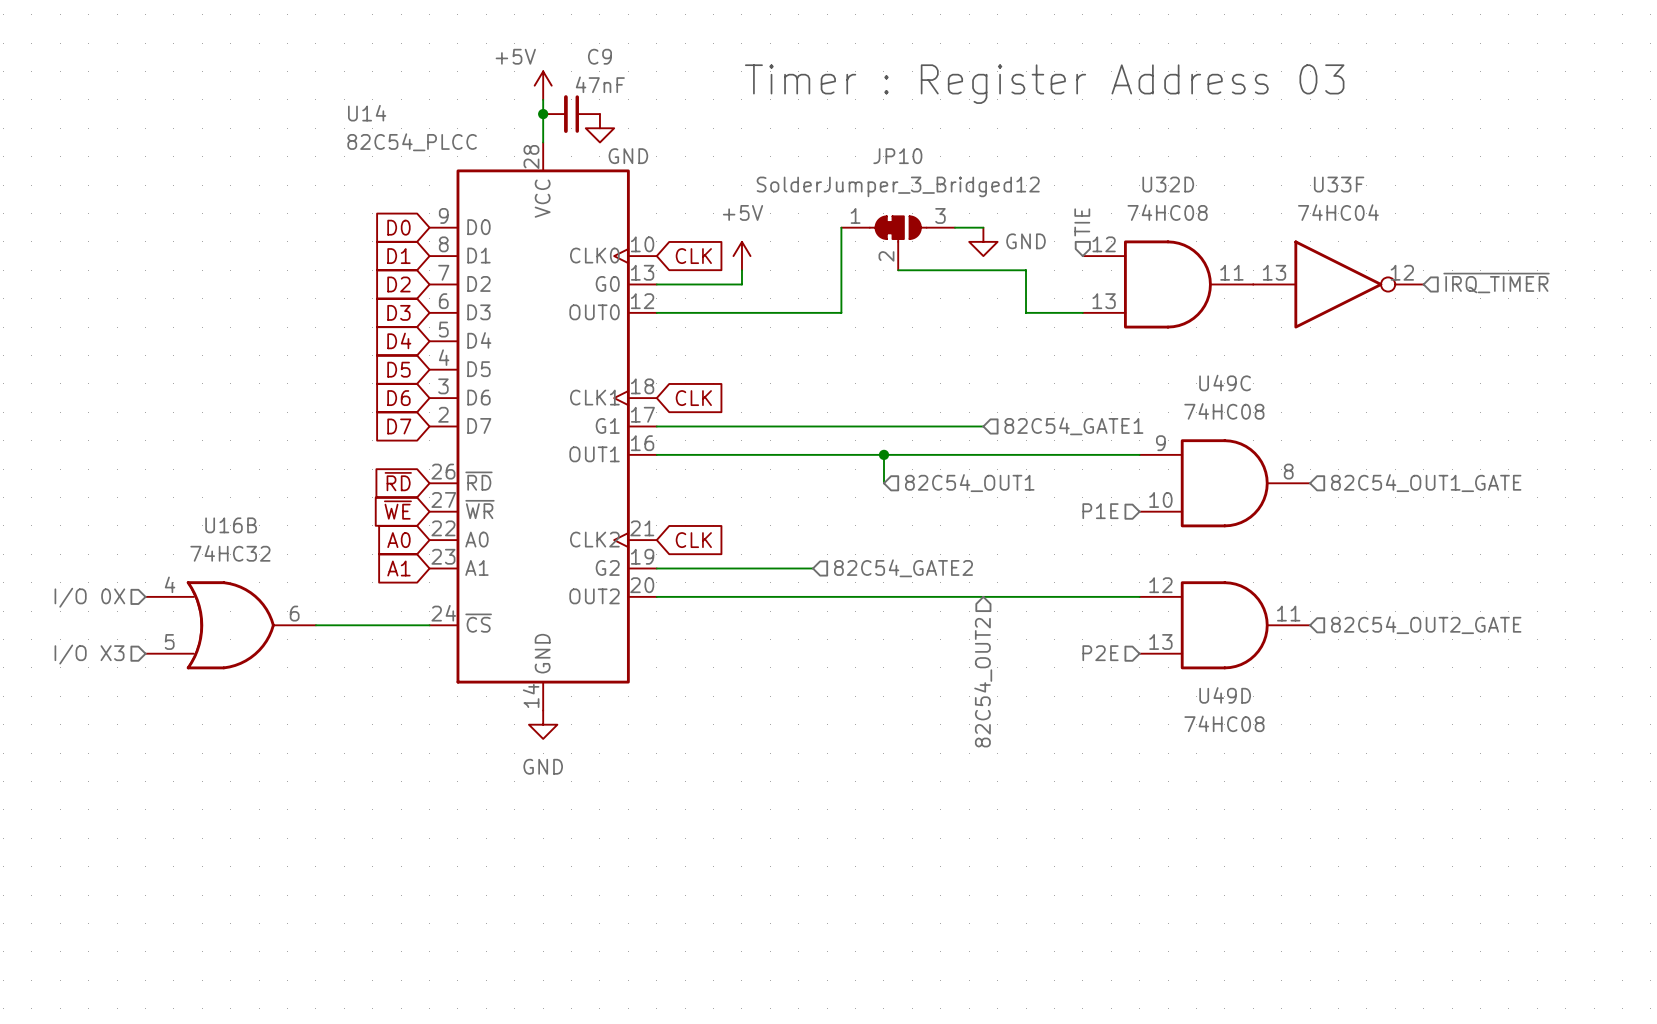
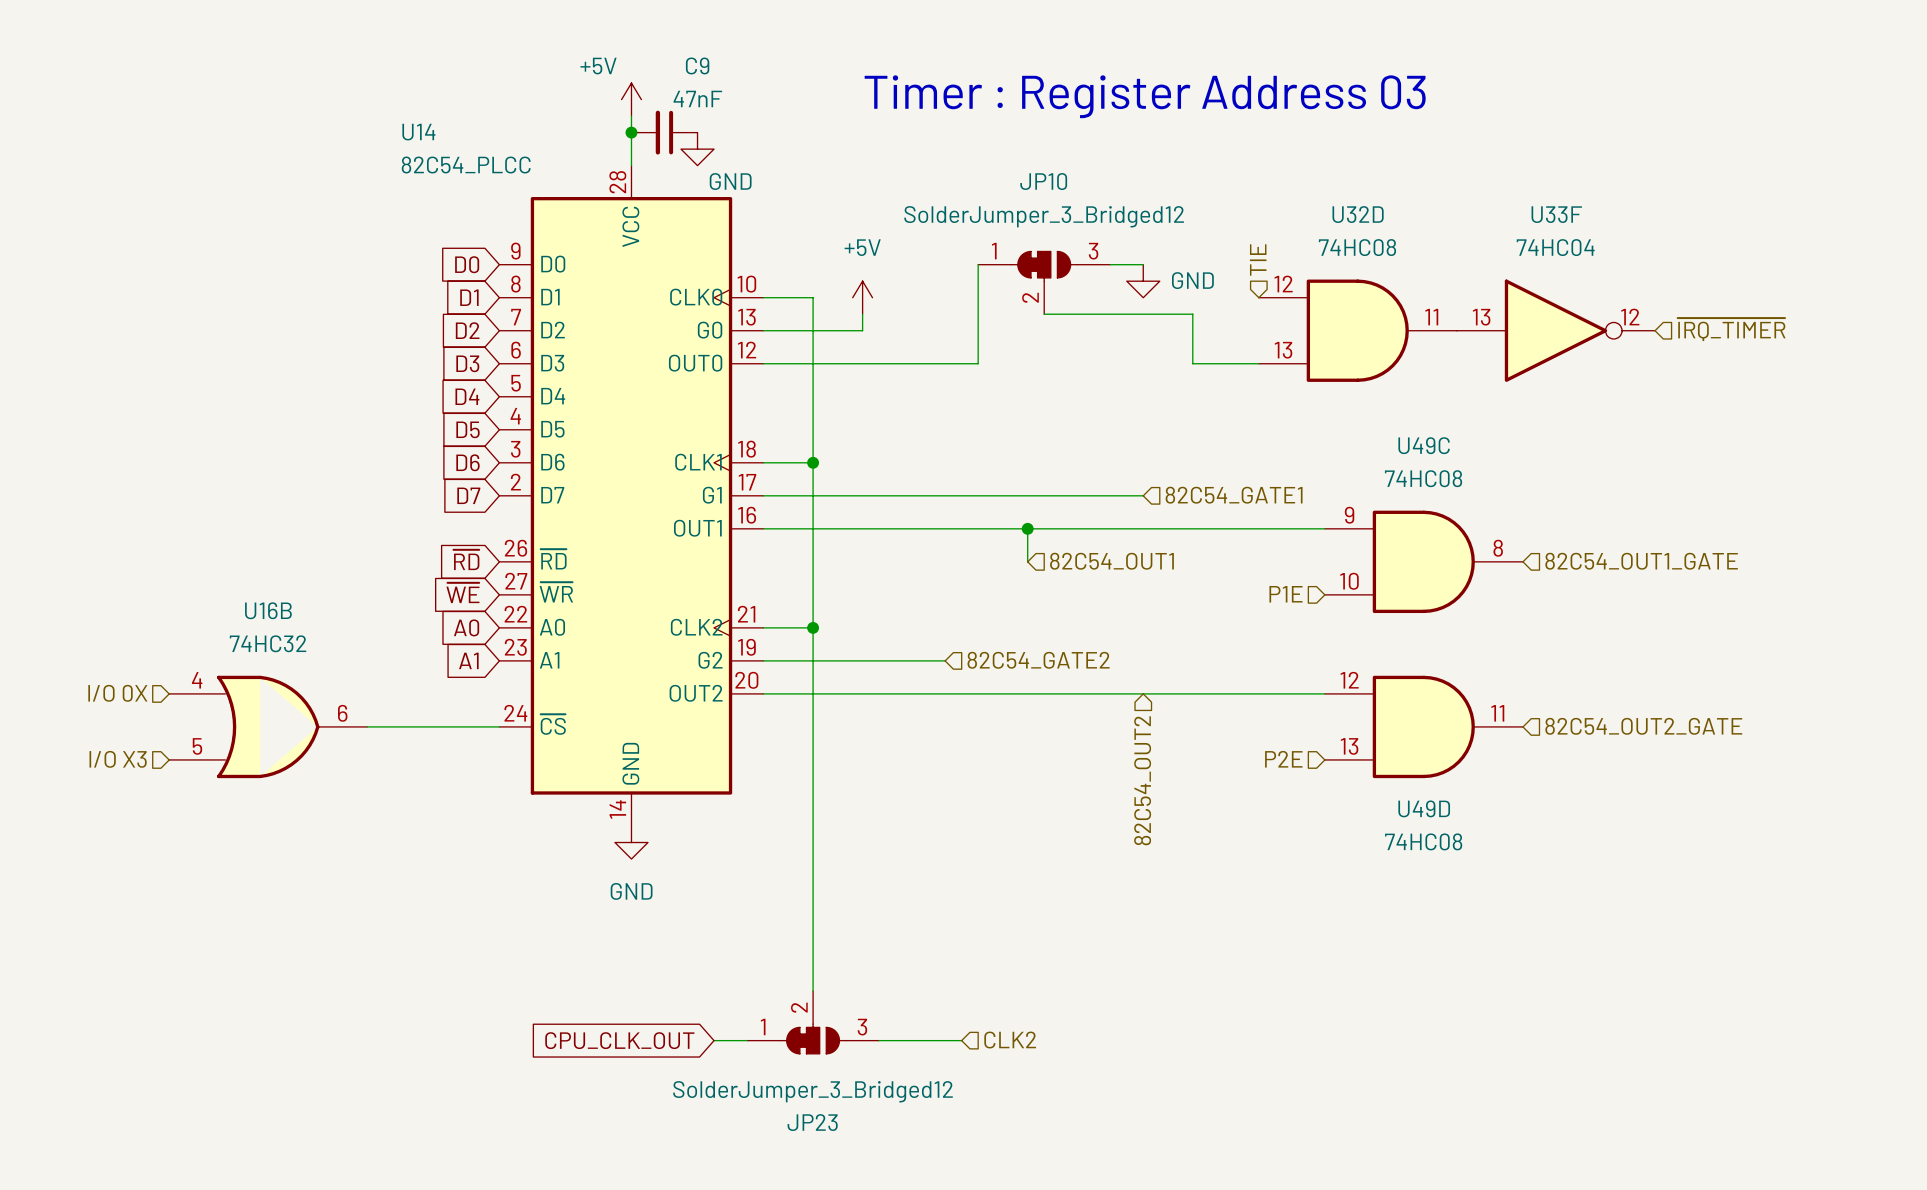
wire: none -> (763, 297) (813, 297) (813, 991)
global label: CLK (693, 256) -> none
wire: none -> (763, 462) (813, 462)
global label: CLK (693, 398) -> none
junction: none -> (813, 462)
wire: none -> (763, 627) (813, 627)
global label: CLK (693, 540) -> none
junction: none -> (813, 627)
JP23: none -> SolderJumper_3_Bridged12 (813, 1022)
hierarchical label: none -> CLK2 (1010, 1040)
global label: none -> CPU_CLK_OUT (619, 1040)
wire: none -> (714, 1040) (747, 1040)
wire: none -> (879, 1040) (961, 1040)

